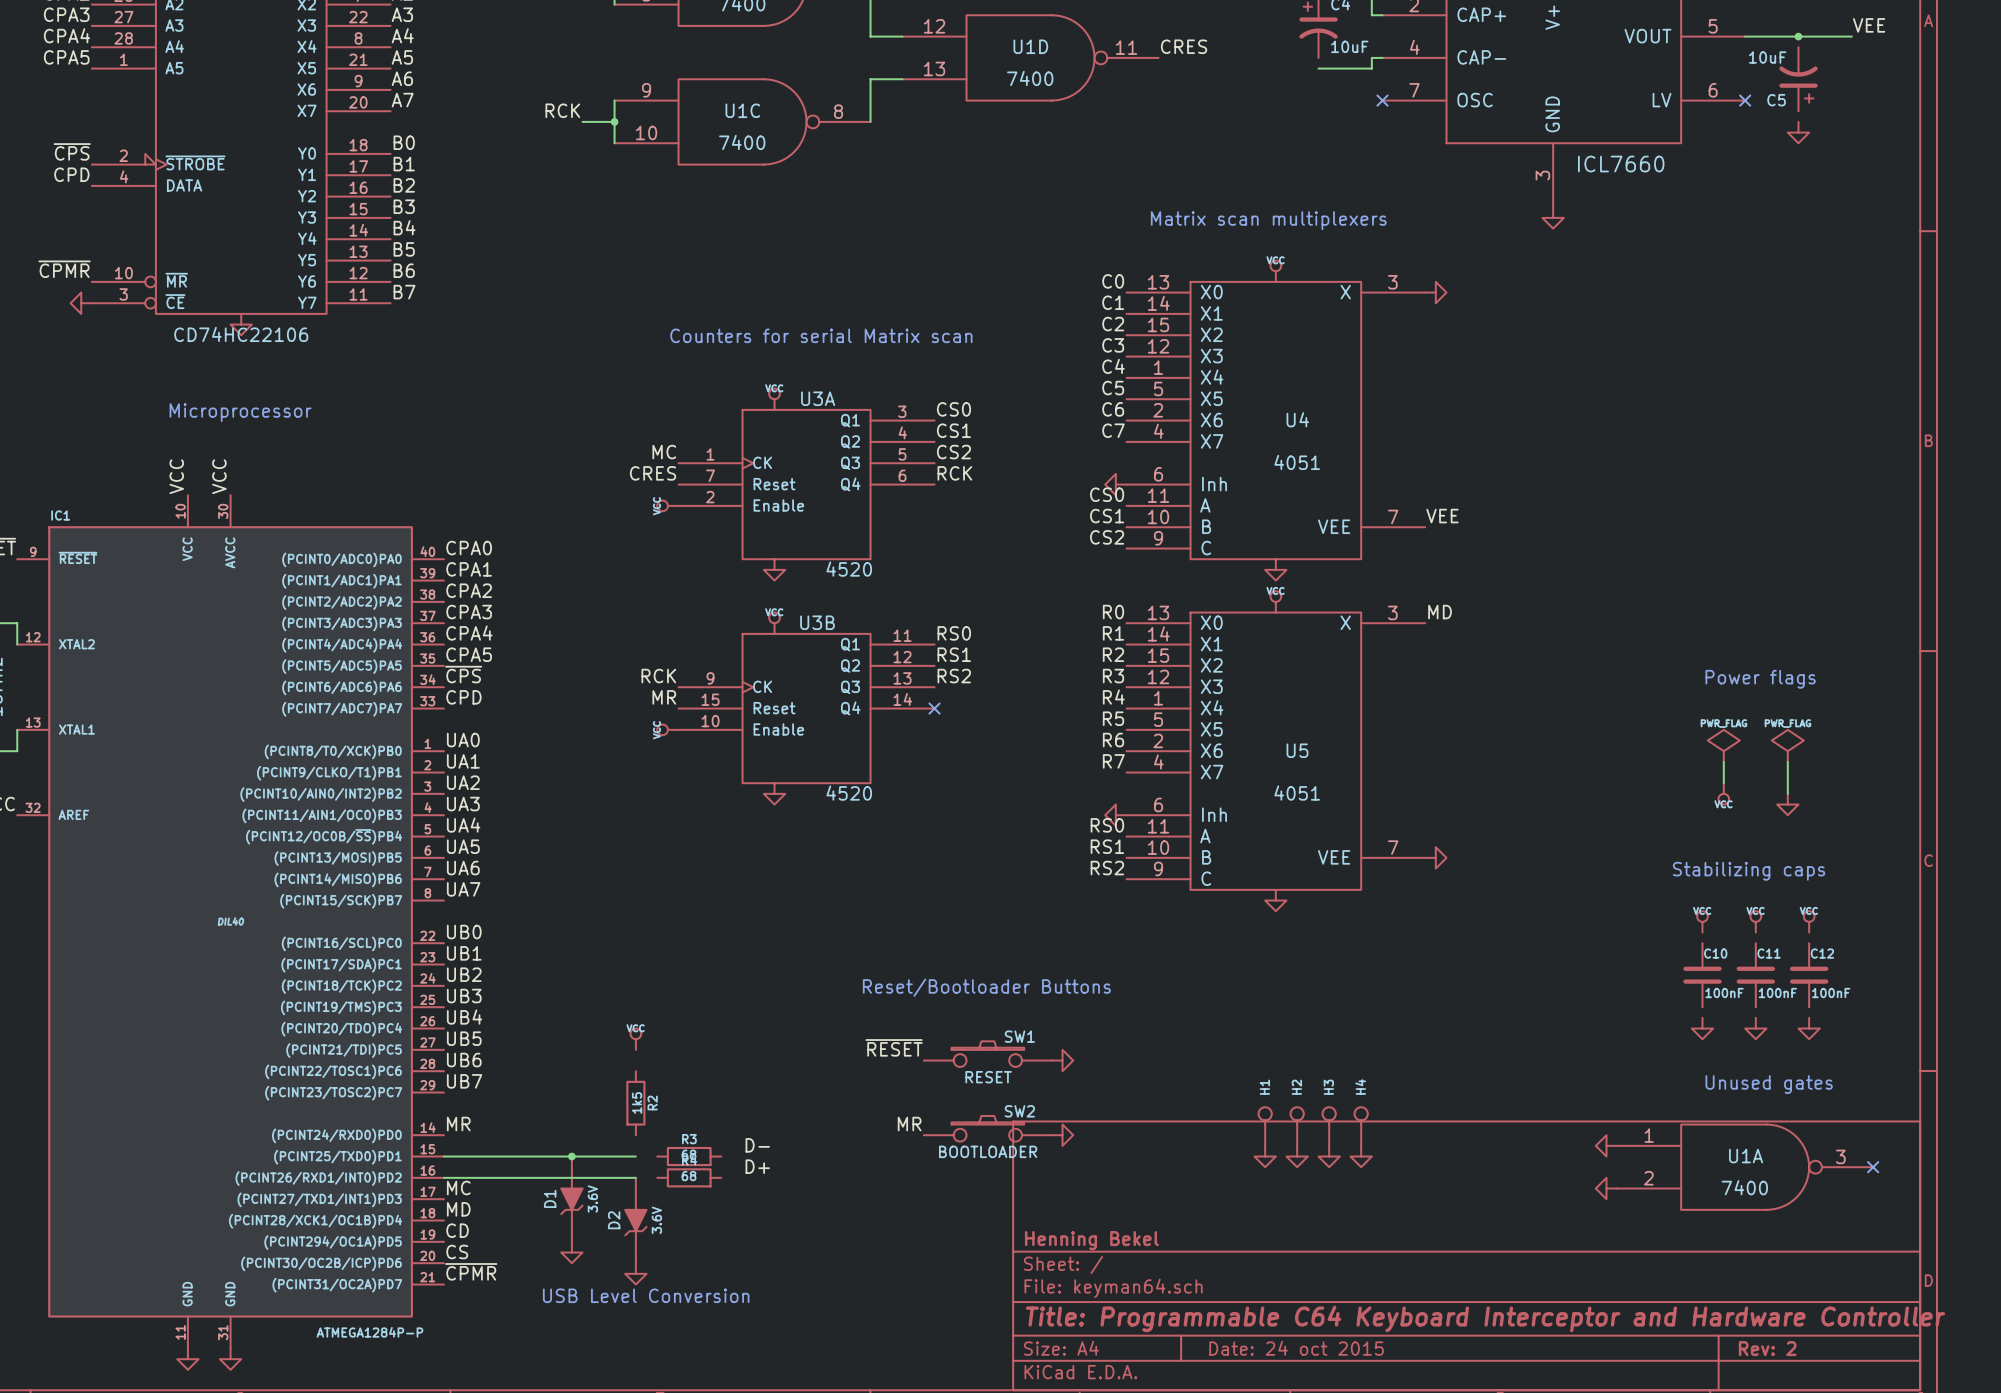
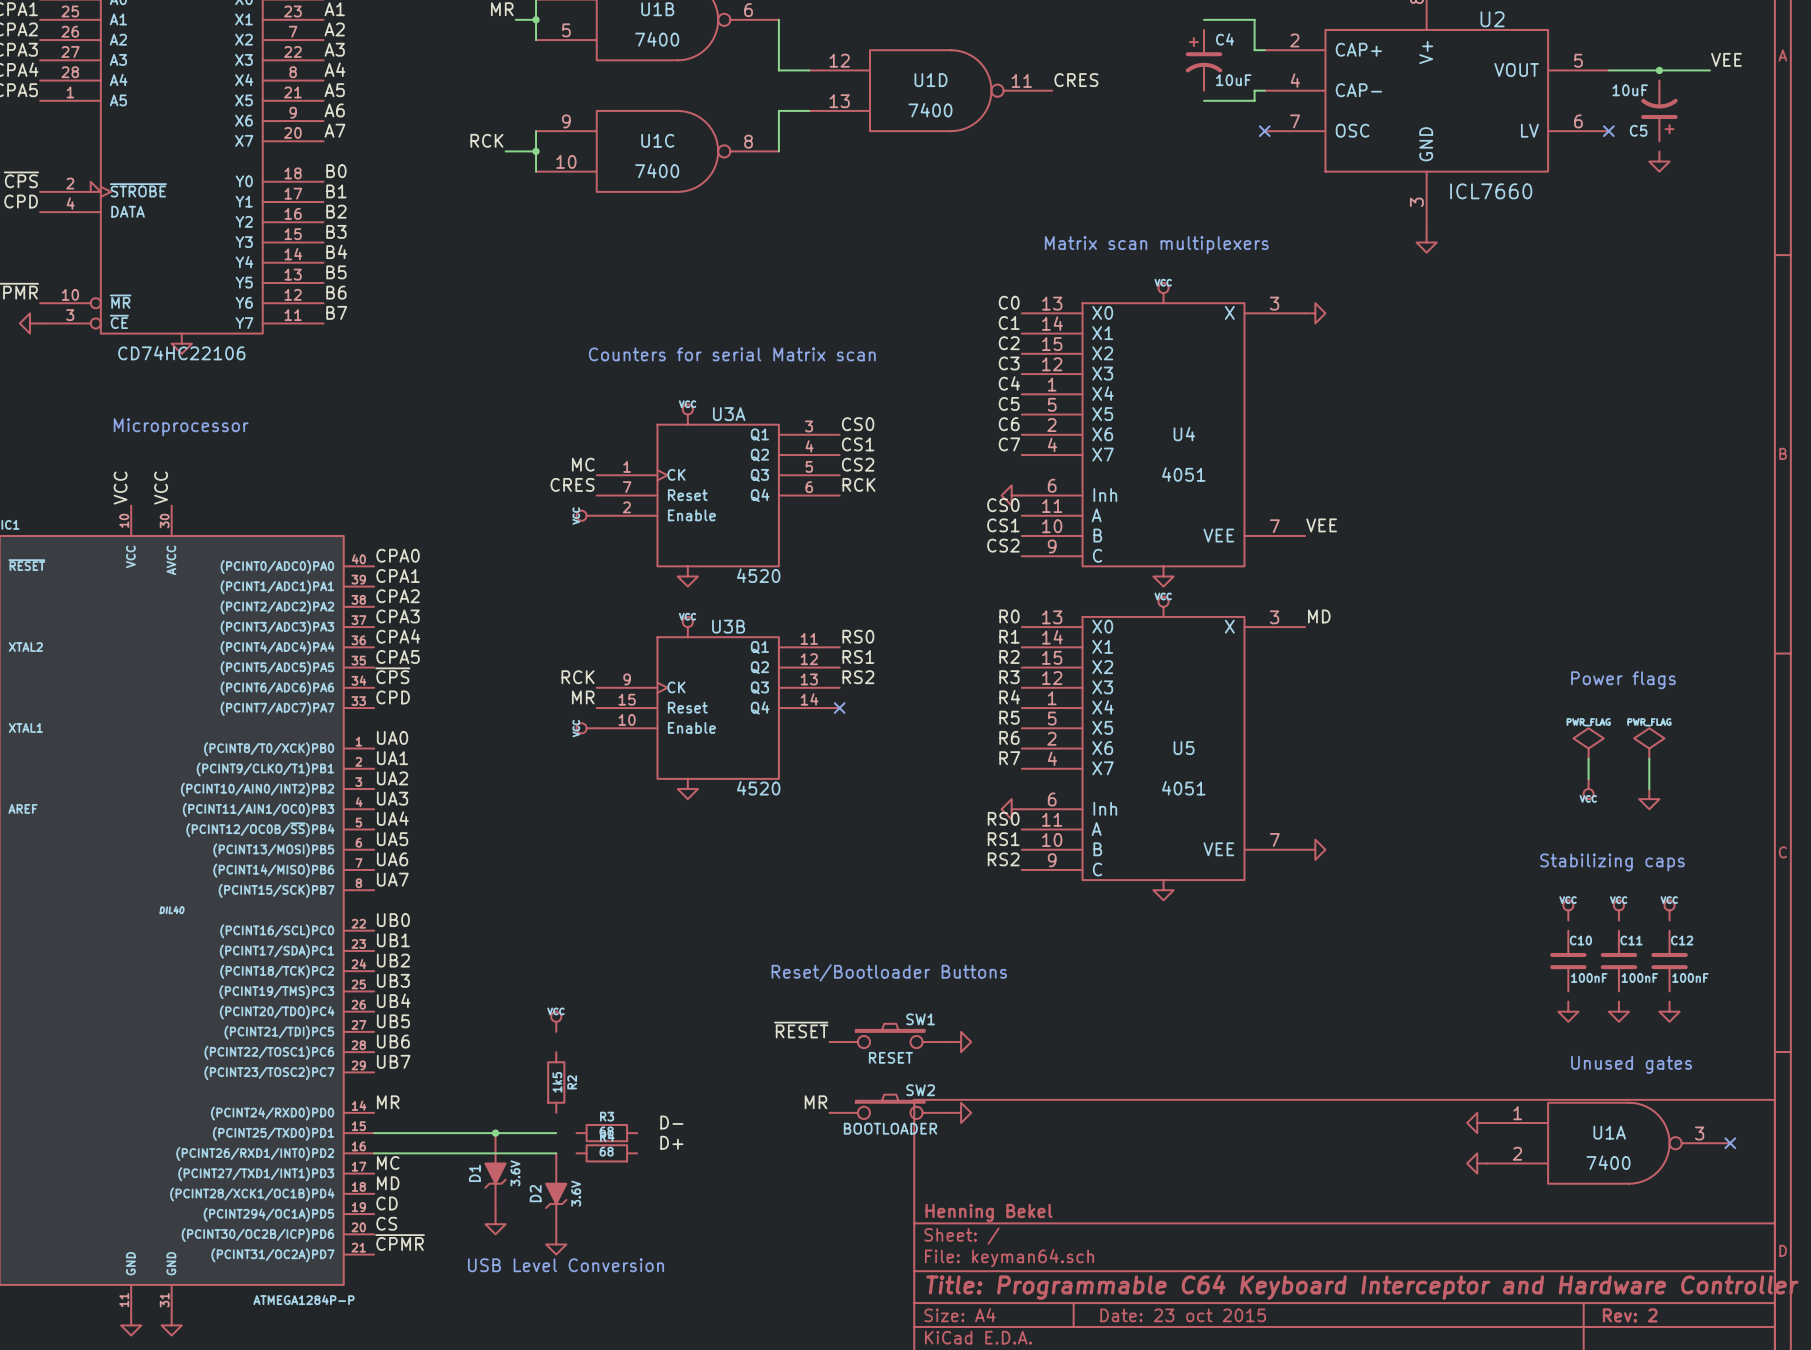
H1: (1265, 1126) -> none
H2: (1297, 1126) -> none
H3: (1329, 1126) -> none
H4: (1361, 1126) -> none
power symbol: (1265, 1156) -> none
power symbol: (1297, 1156) -> none
power symbol: (1329, 1156) -> none
power symbol: (1361, 1156) -> none
title block: Date: 24 oct 2015 (1296, 1348) -> Date: 23 oct 2015 (1183, 1315)

